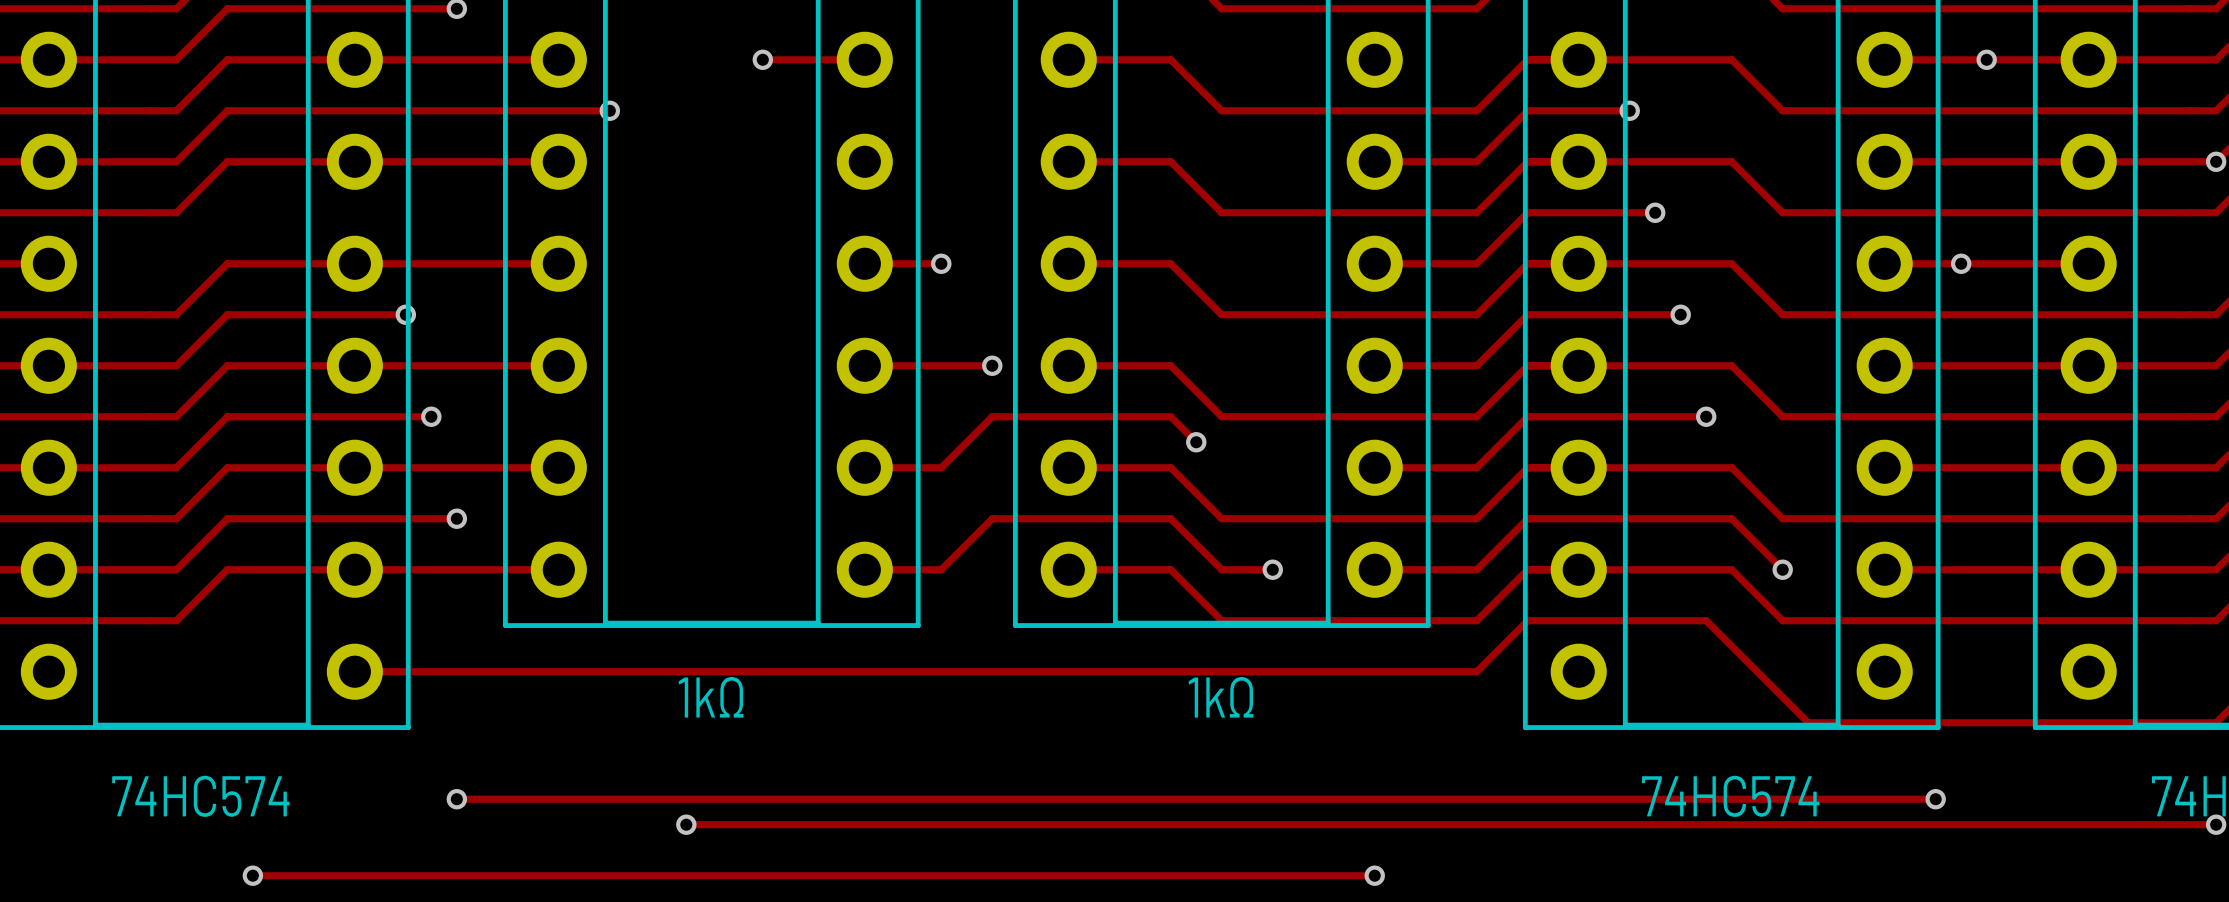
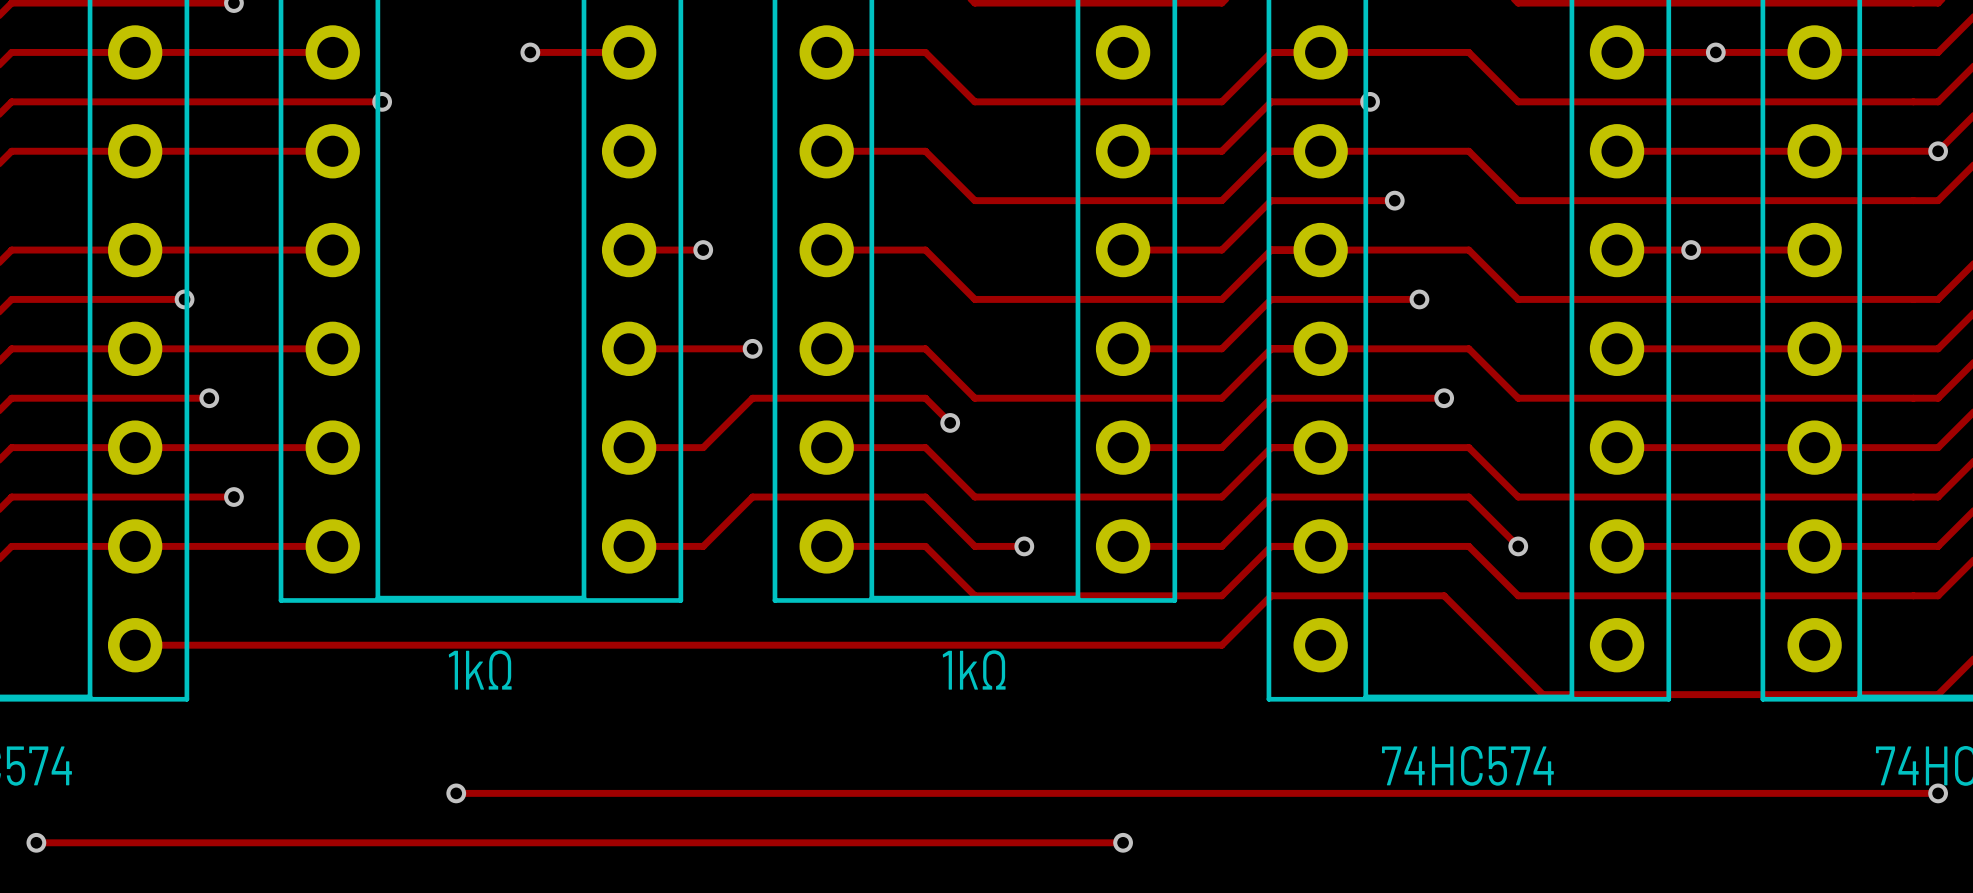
track: (456, 799) (1935, 799) -> none
via: (456, 799) -> none
via: (1935, 799) -> none

